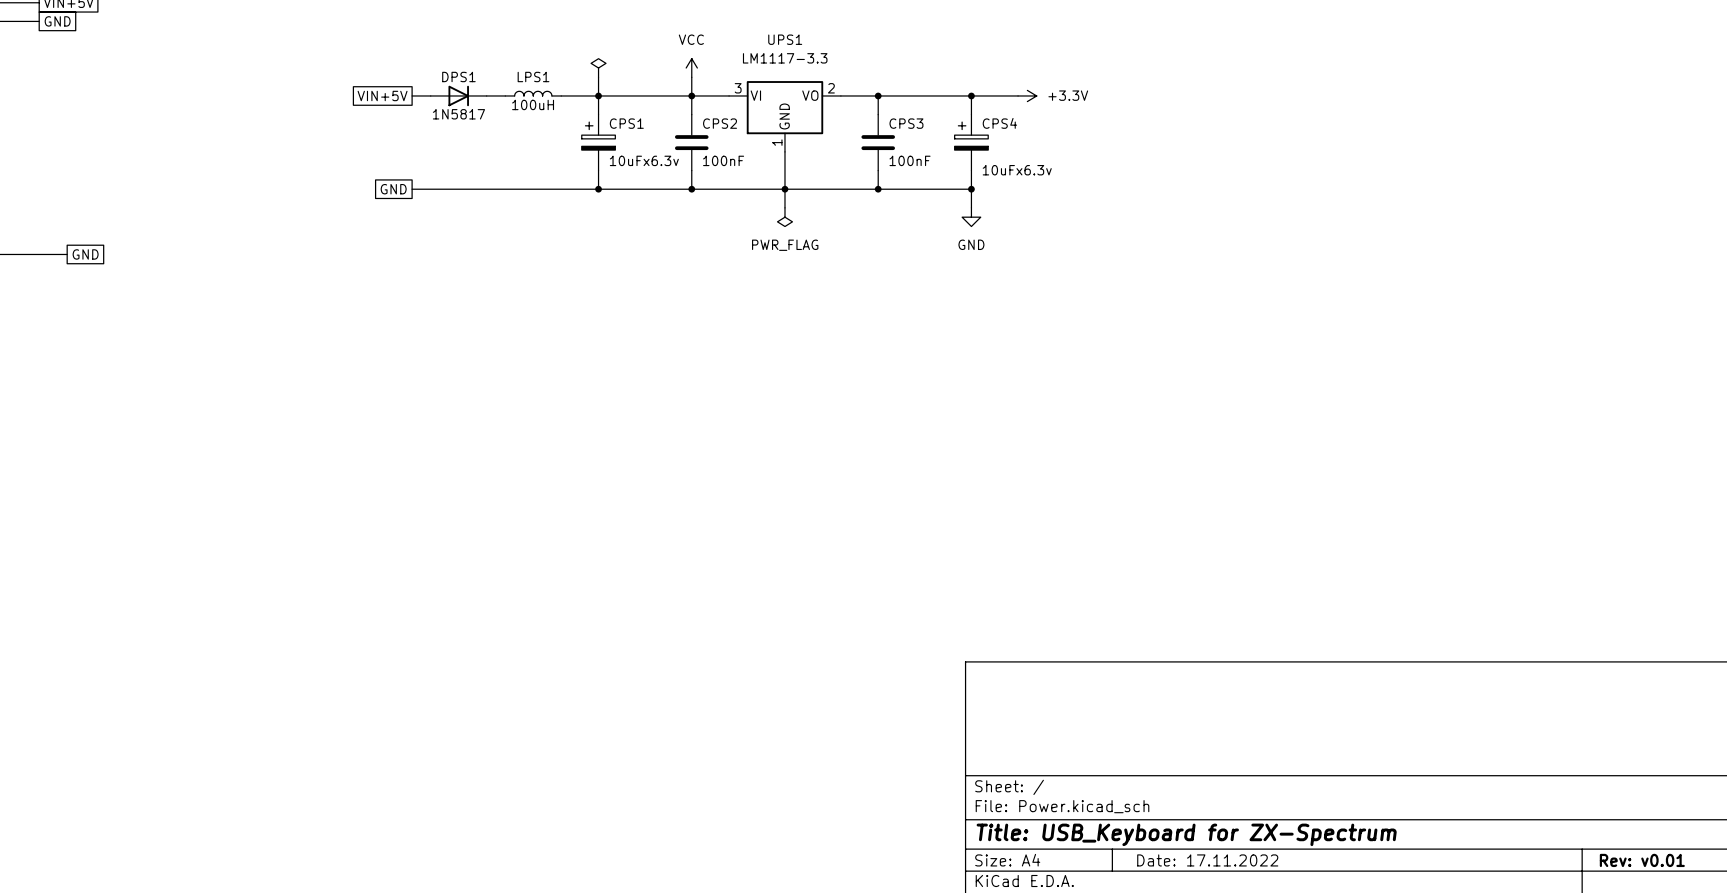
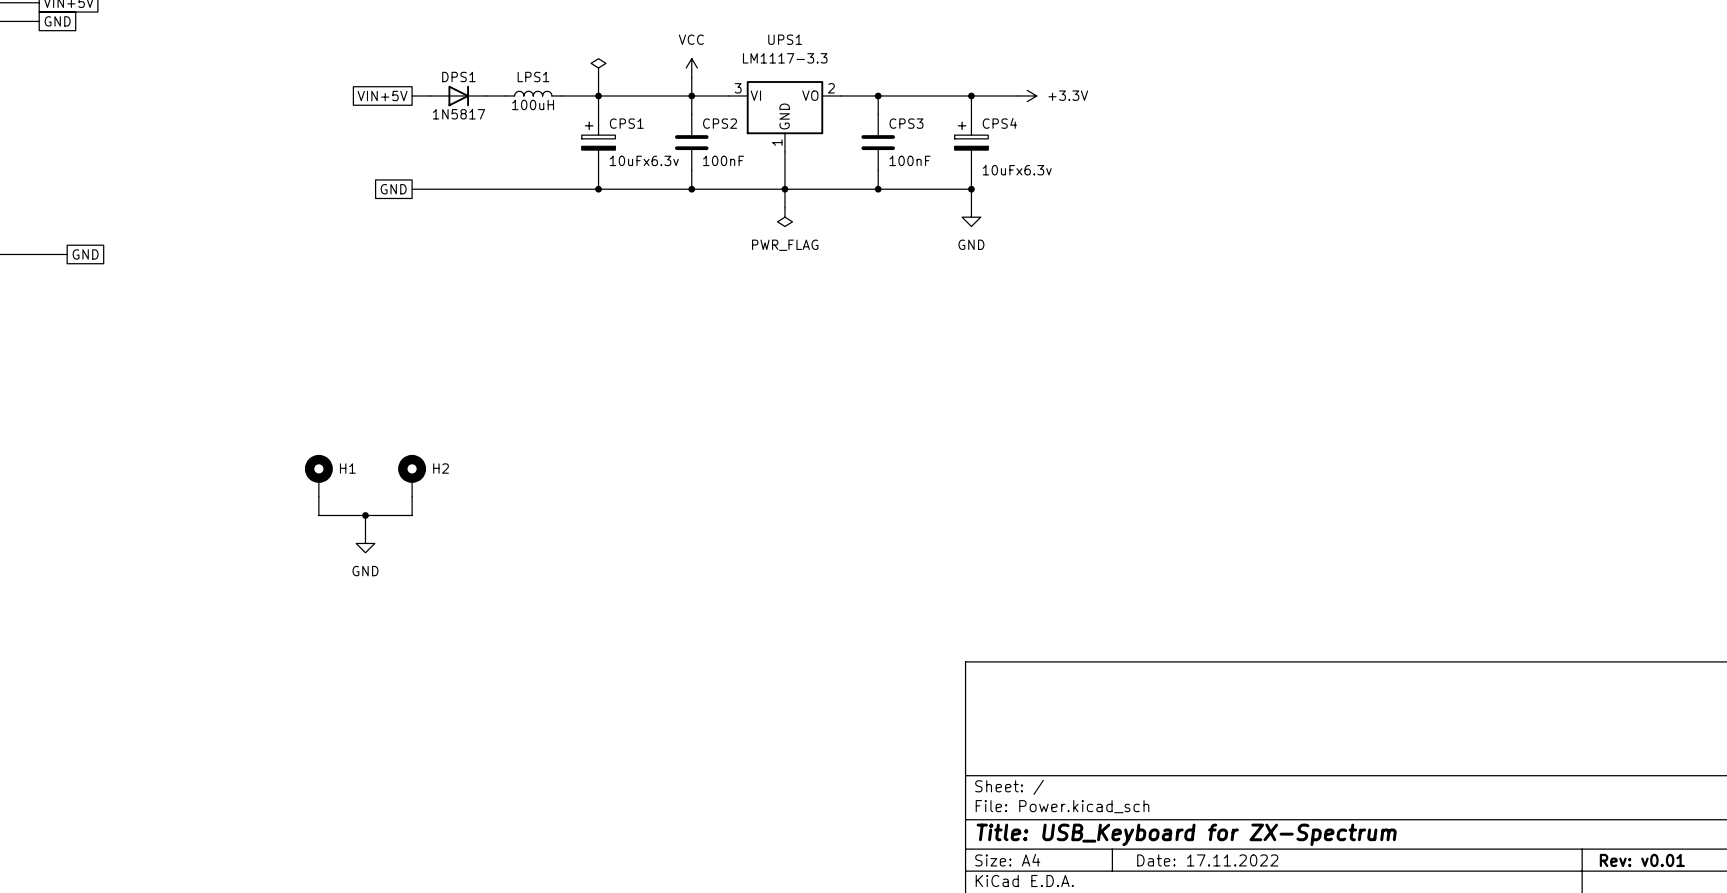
H1: none -> (318, 475)
H2: none -> (412, 475)
wire: none -> (318, 496) (318, 515) (412, 515) (412, 496)
wire: none -> (365, 515) (365, 534)
junction: none -> (365, 515)
power symbol: none -> GND (365, 543)

